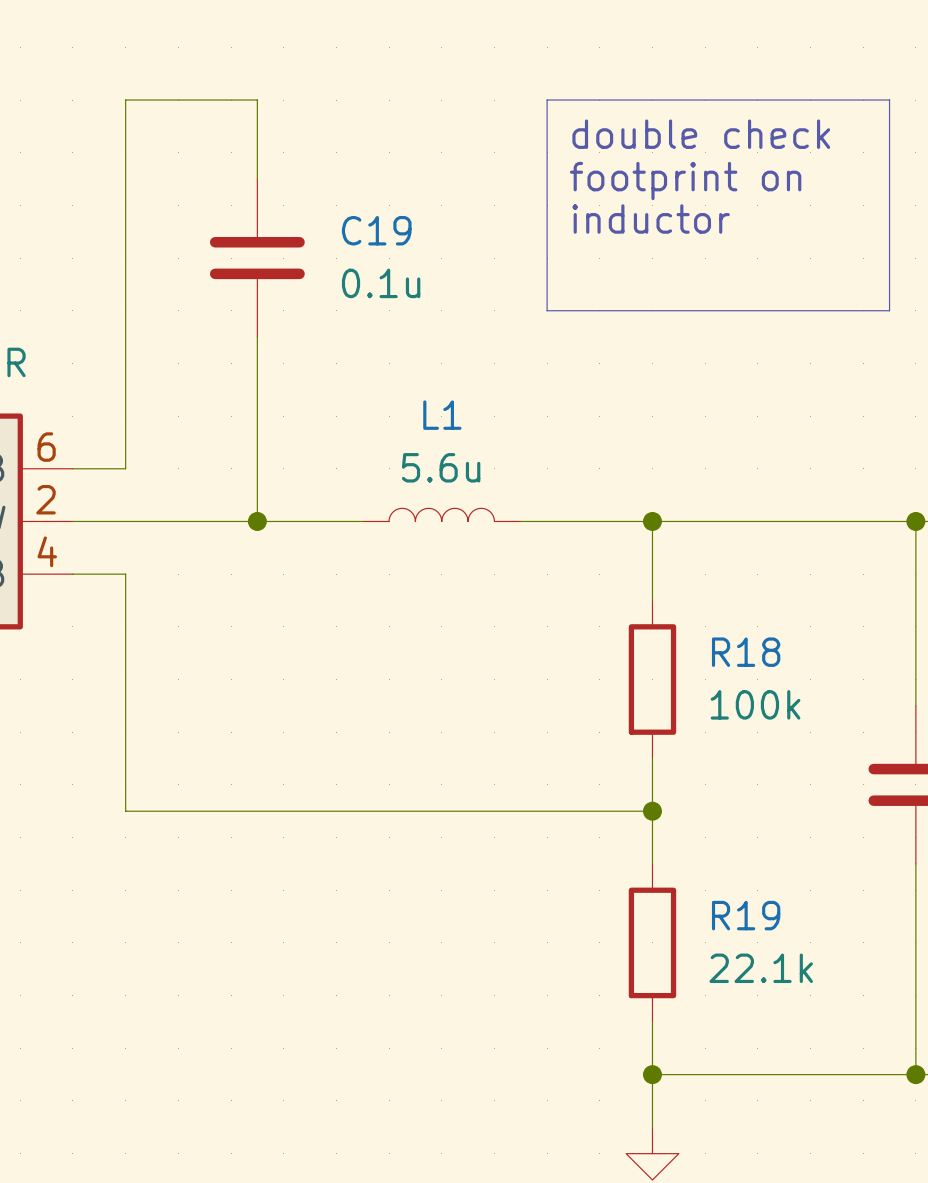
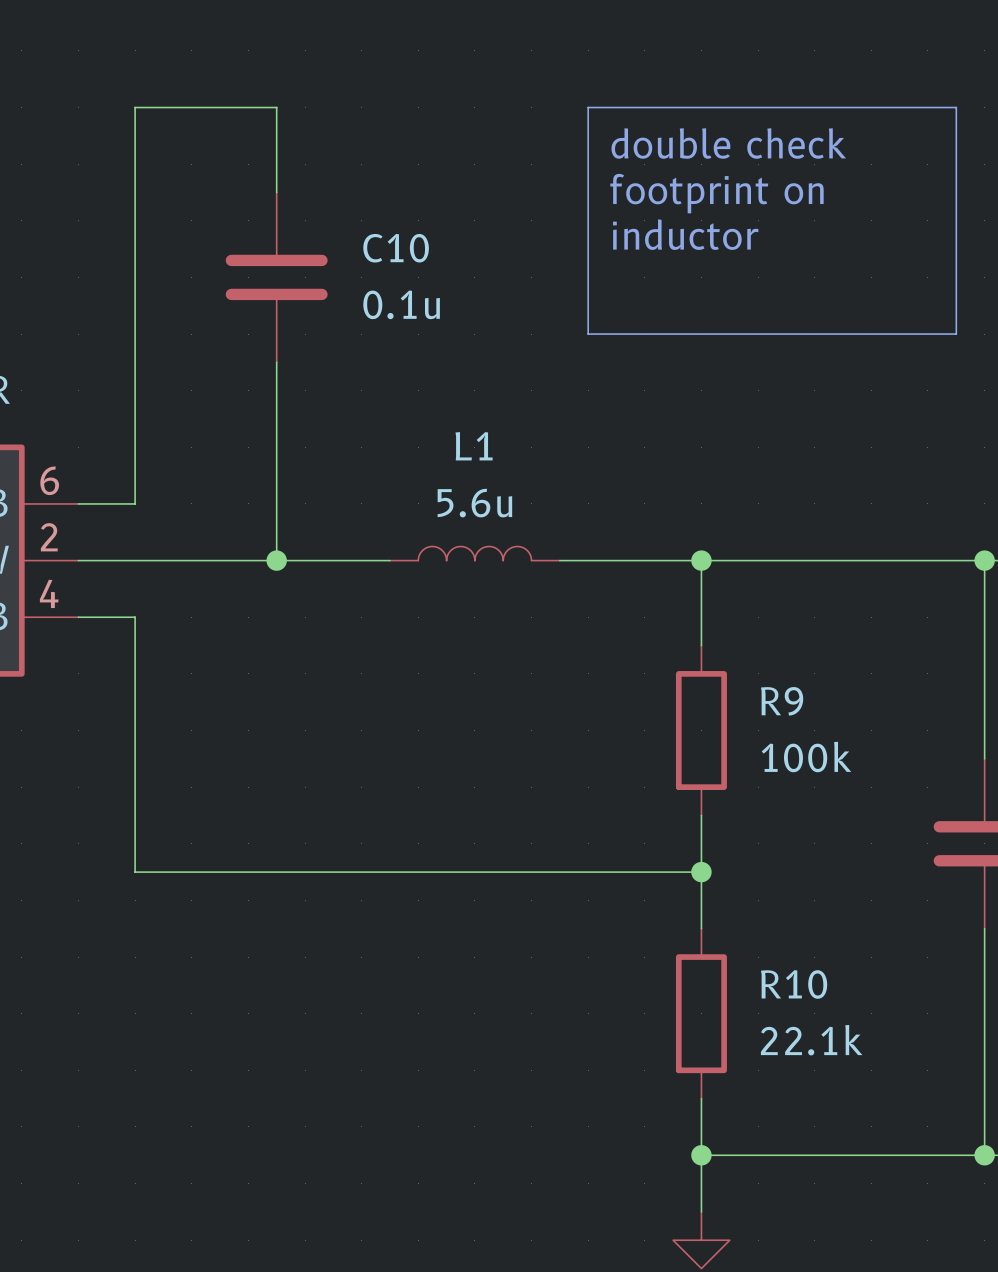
C19 name: C19 (376, 230) -> C10 (396, 248)
R18 name: R18 (746, 652) -> R9 (782, 701)
R19 name: R19 (746, 915) -> R10 (794, 984)

